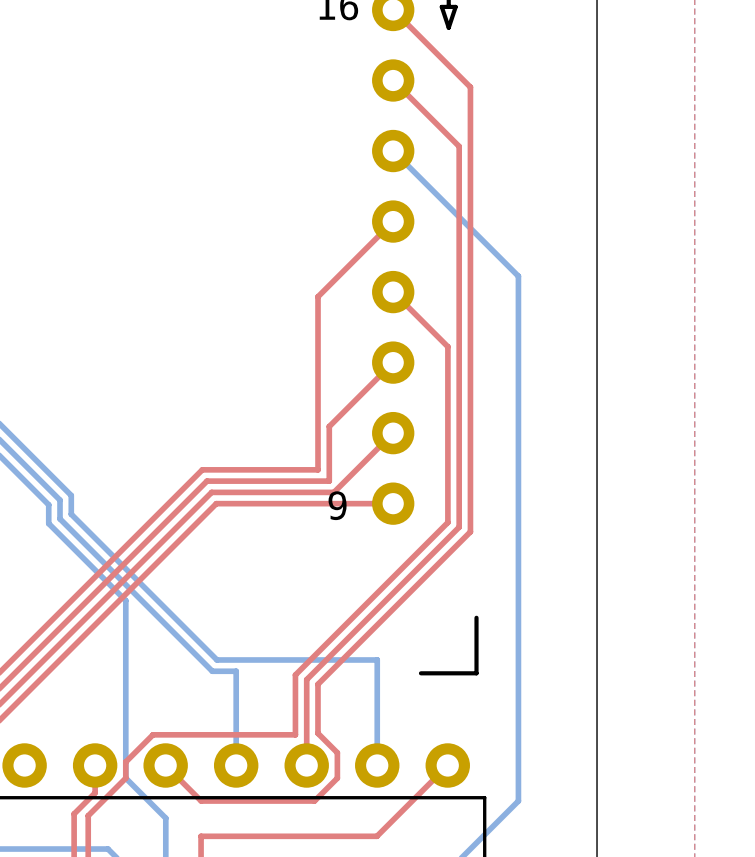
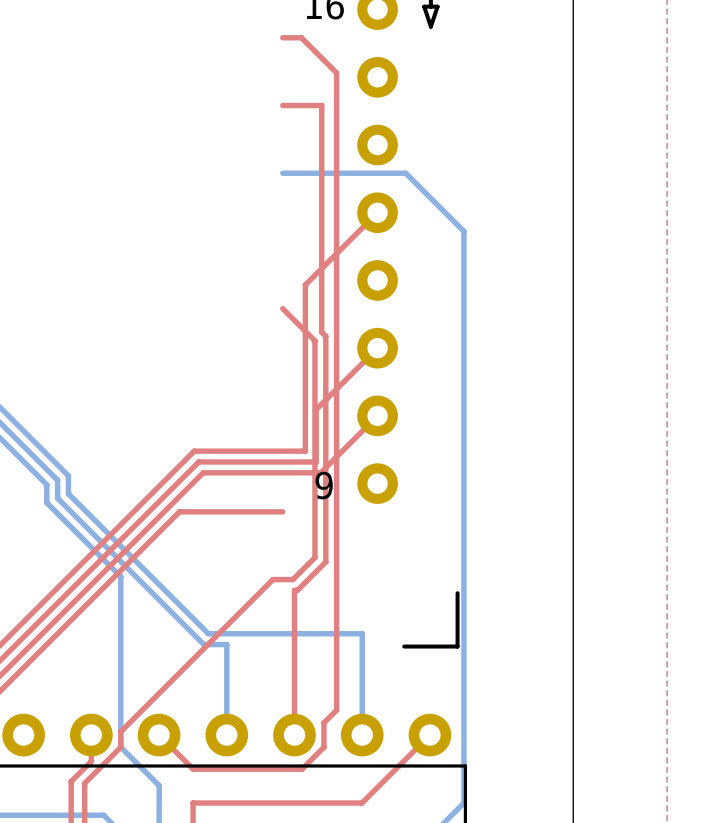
top track: (393, 9) (470, 87) (470, 531) (317, 684) (317, 733) (337, 752) -> (282, 37) (301, 37) (336, 72) (336, 710) (323, 722)
top track: (393, 80) (459, 146) (459, 527) (306, 679) -> (282, 105) (321, 105) (321, 332) (325, 336) (325, 562) (297, 590) (294, 590) (294, 652)
bottom track: (393, 151) (422, 180) -> (282, 173) (405, 173)
bottom track: (483, 240) (518, 276) (518, 801) (483, 836) -> (463, 231) (463, 803)
top track: (393, 292) (447, 346) (447, 522) (295, 674) (295, 734) (152, 734) -> (282, 308) (314, 340) (314, 557) (292, 579) (272, 579) (146, 705)
top track: (393, 503) (216, 503) (186, 533) -> (282, 511) (179, 511)

